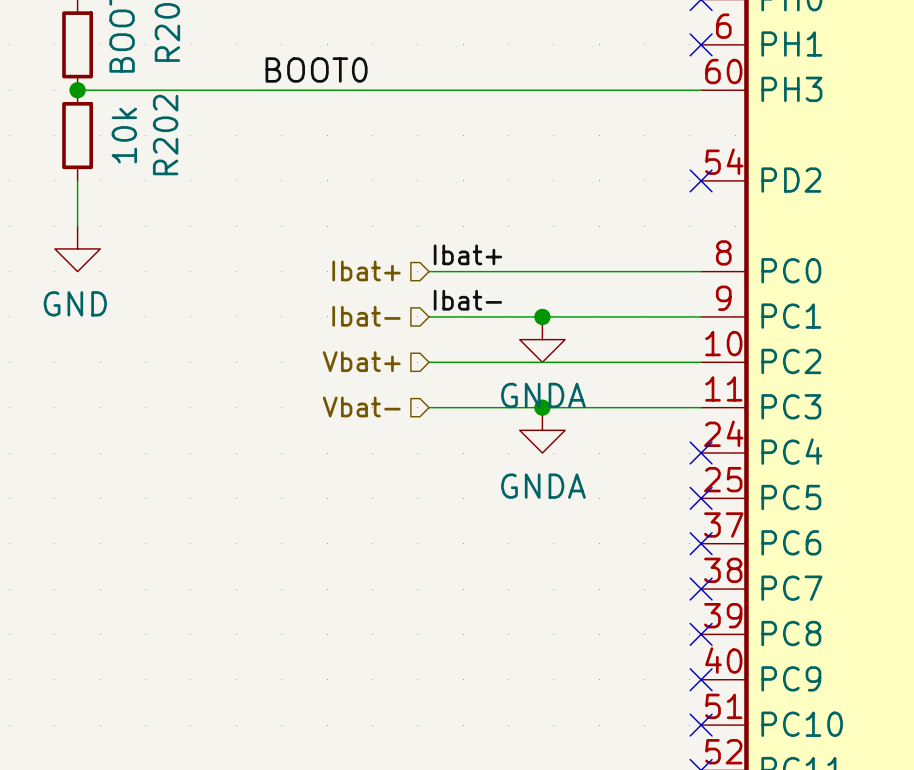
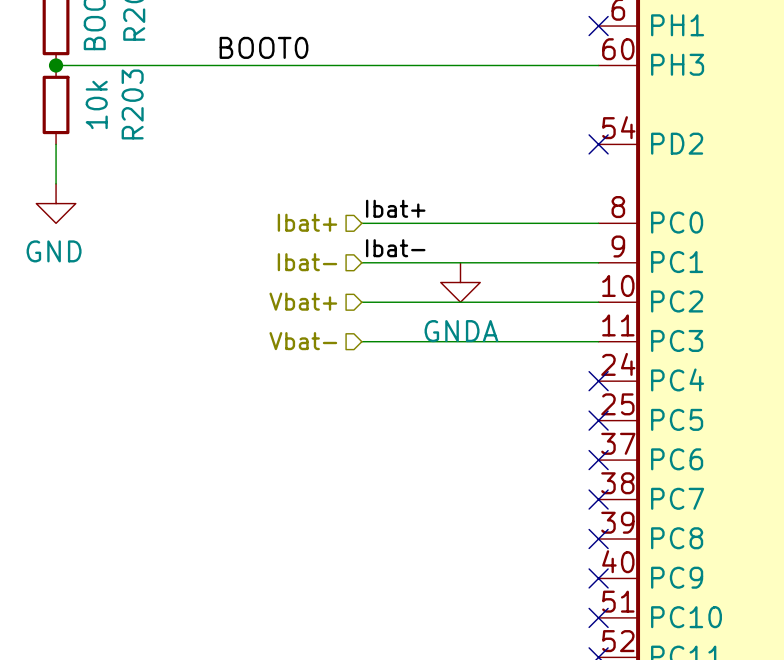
R202 name: R202 (165, 135) -> R203 (132, 104)
junction: (542, 316) -> none
junction: (542, 407) -> none
power symbol: GNDA (542, 430) -> none

